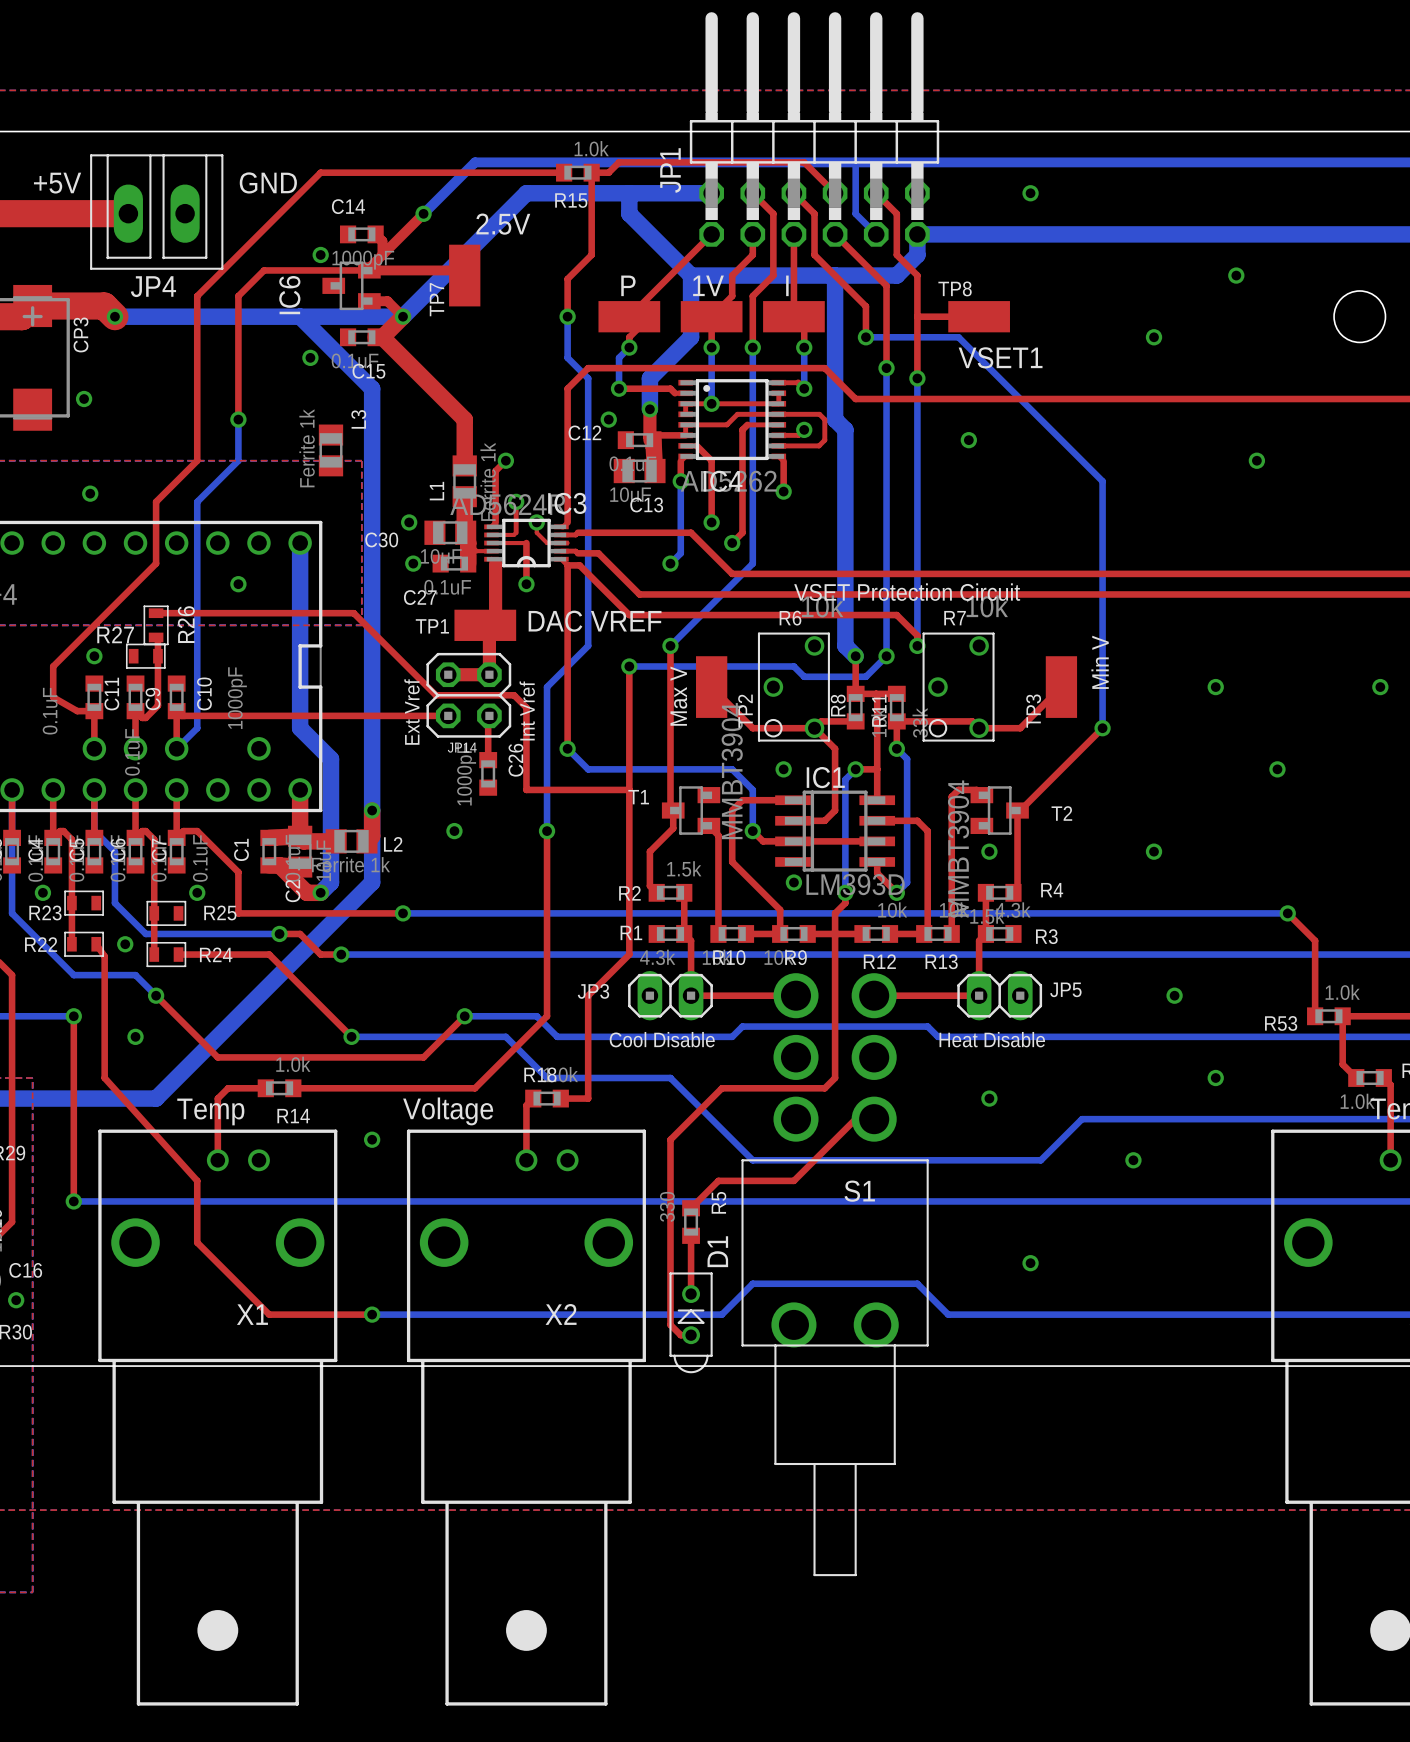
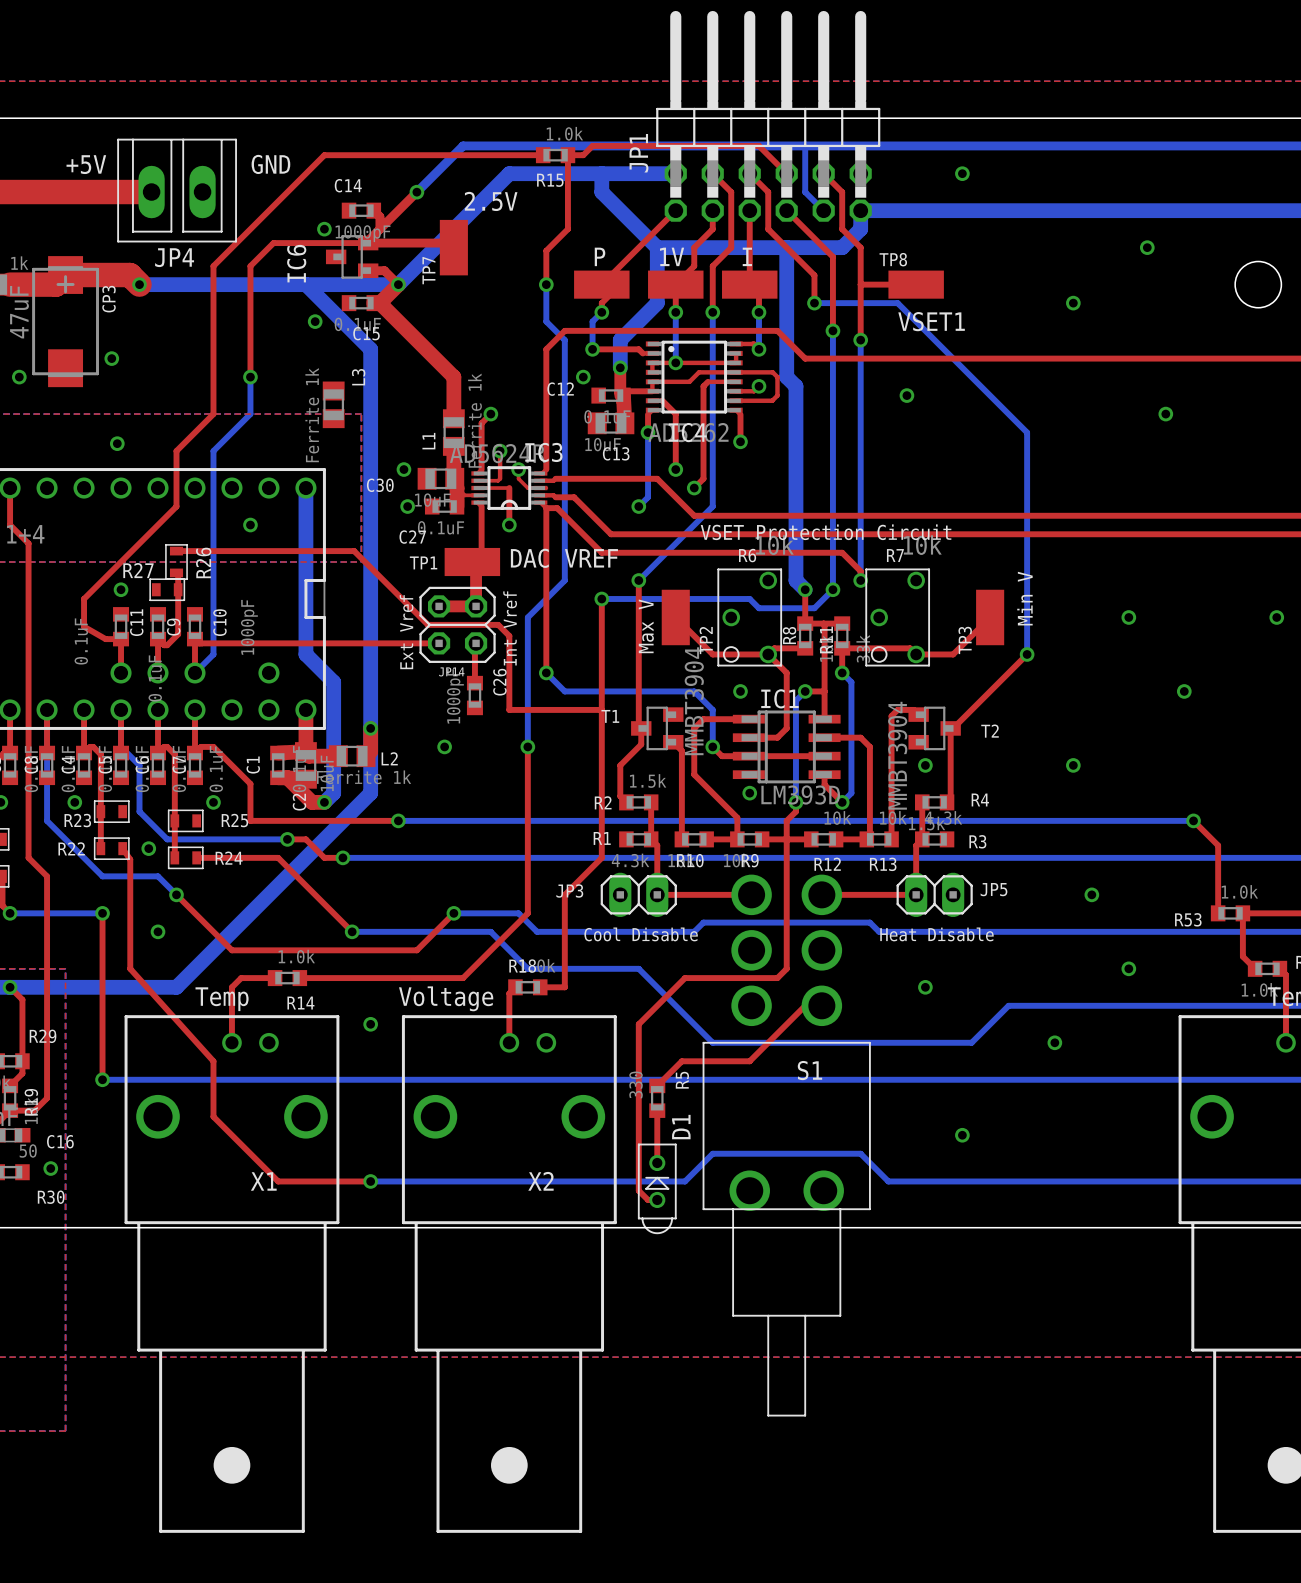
top track width: thick (495, 563) (495, 615) -> thin (481, 506) (481, 552)

